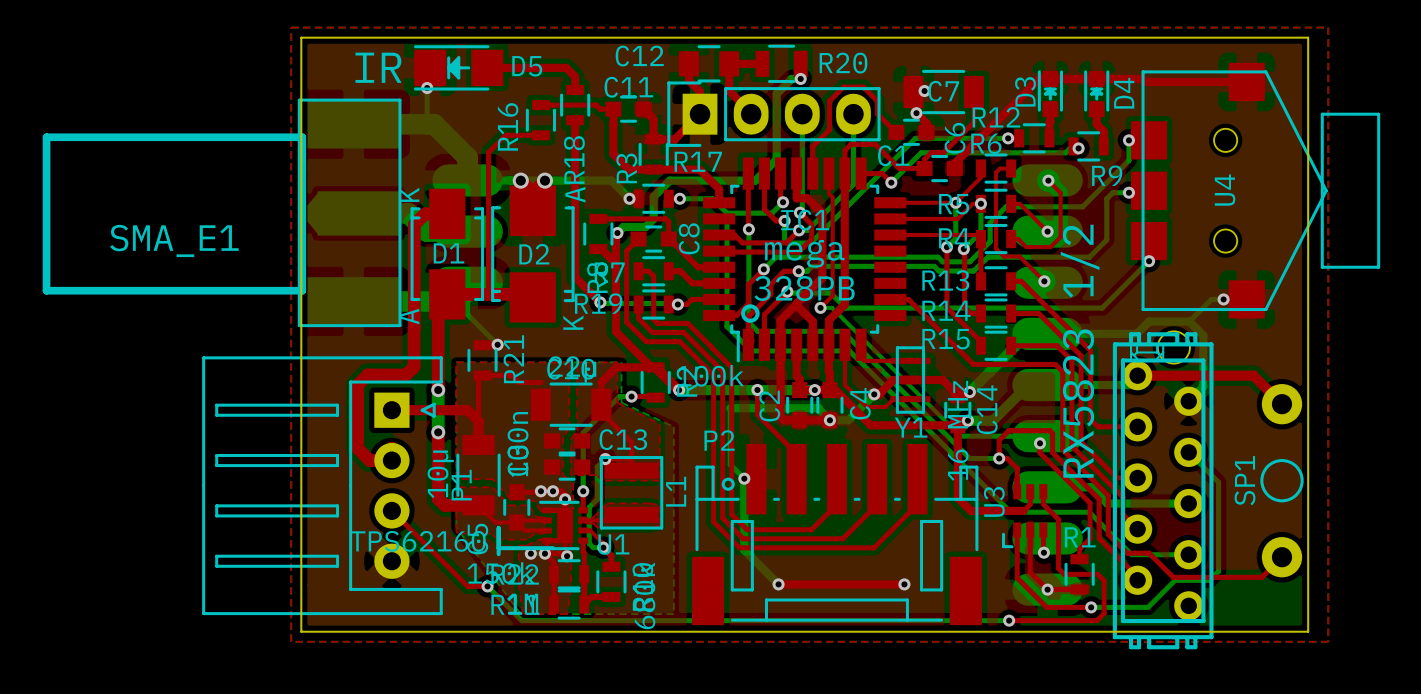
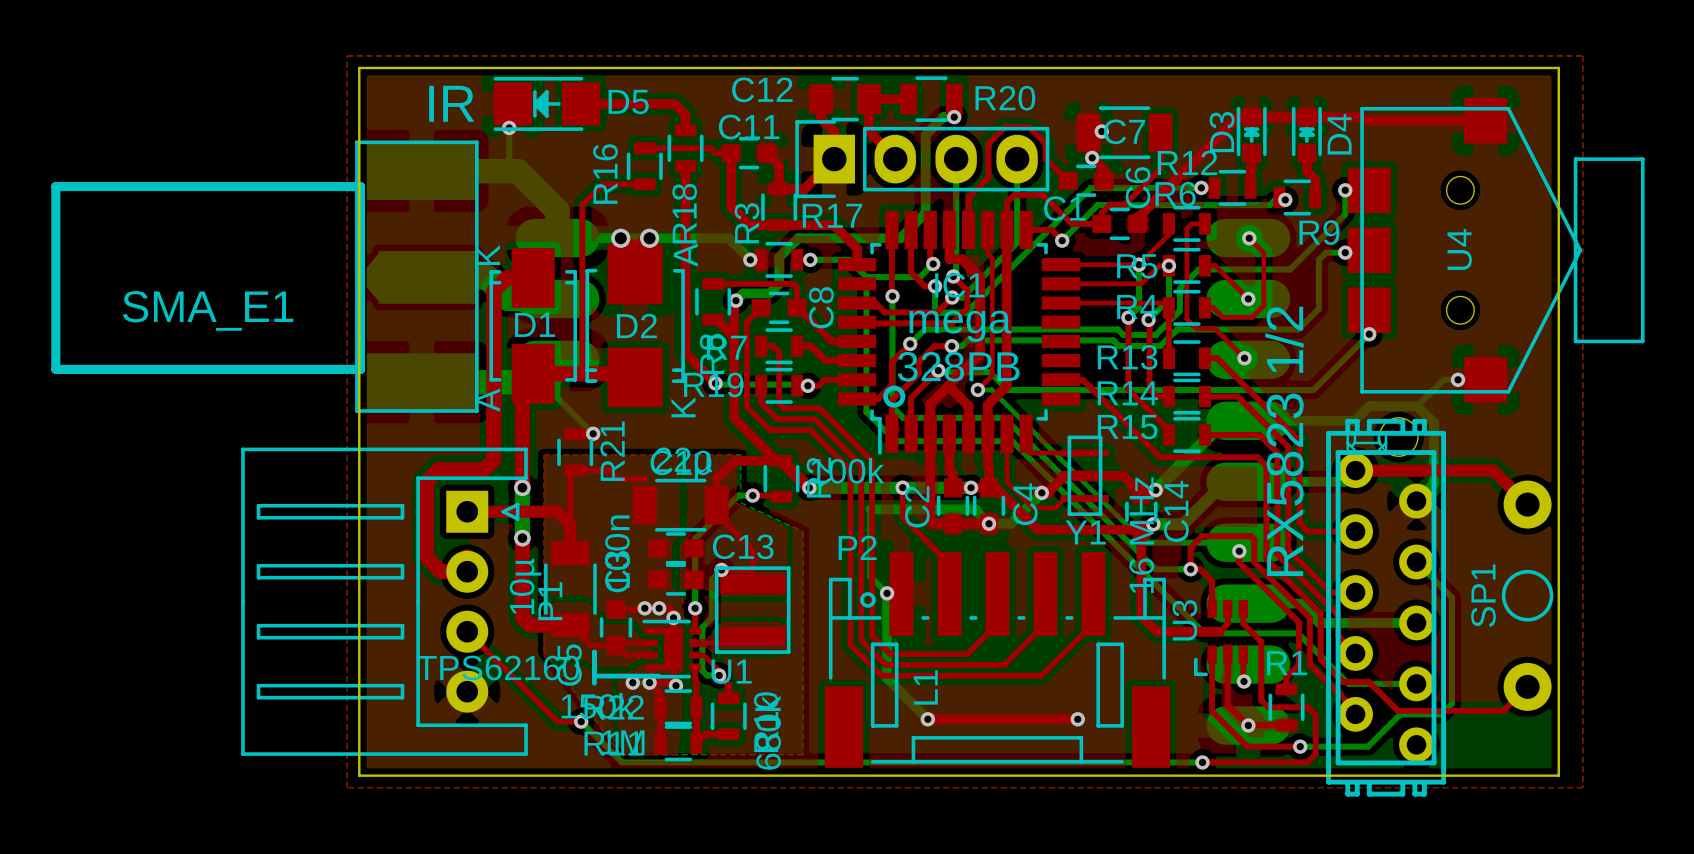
L1 name position: L1 (676, 491) -> L1 (925, 687)

